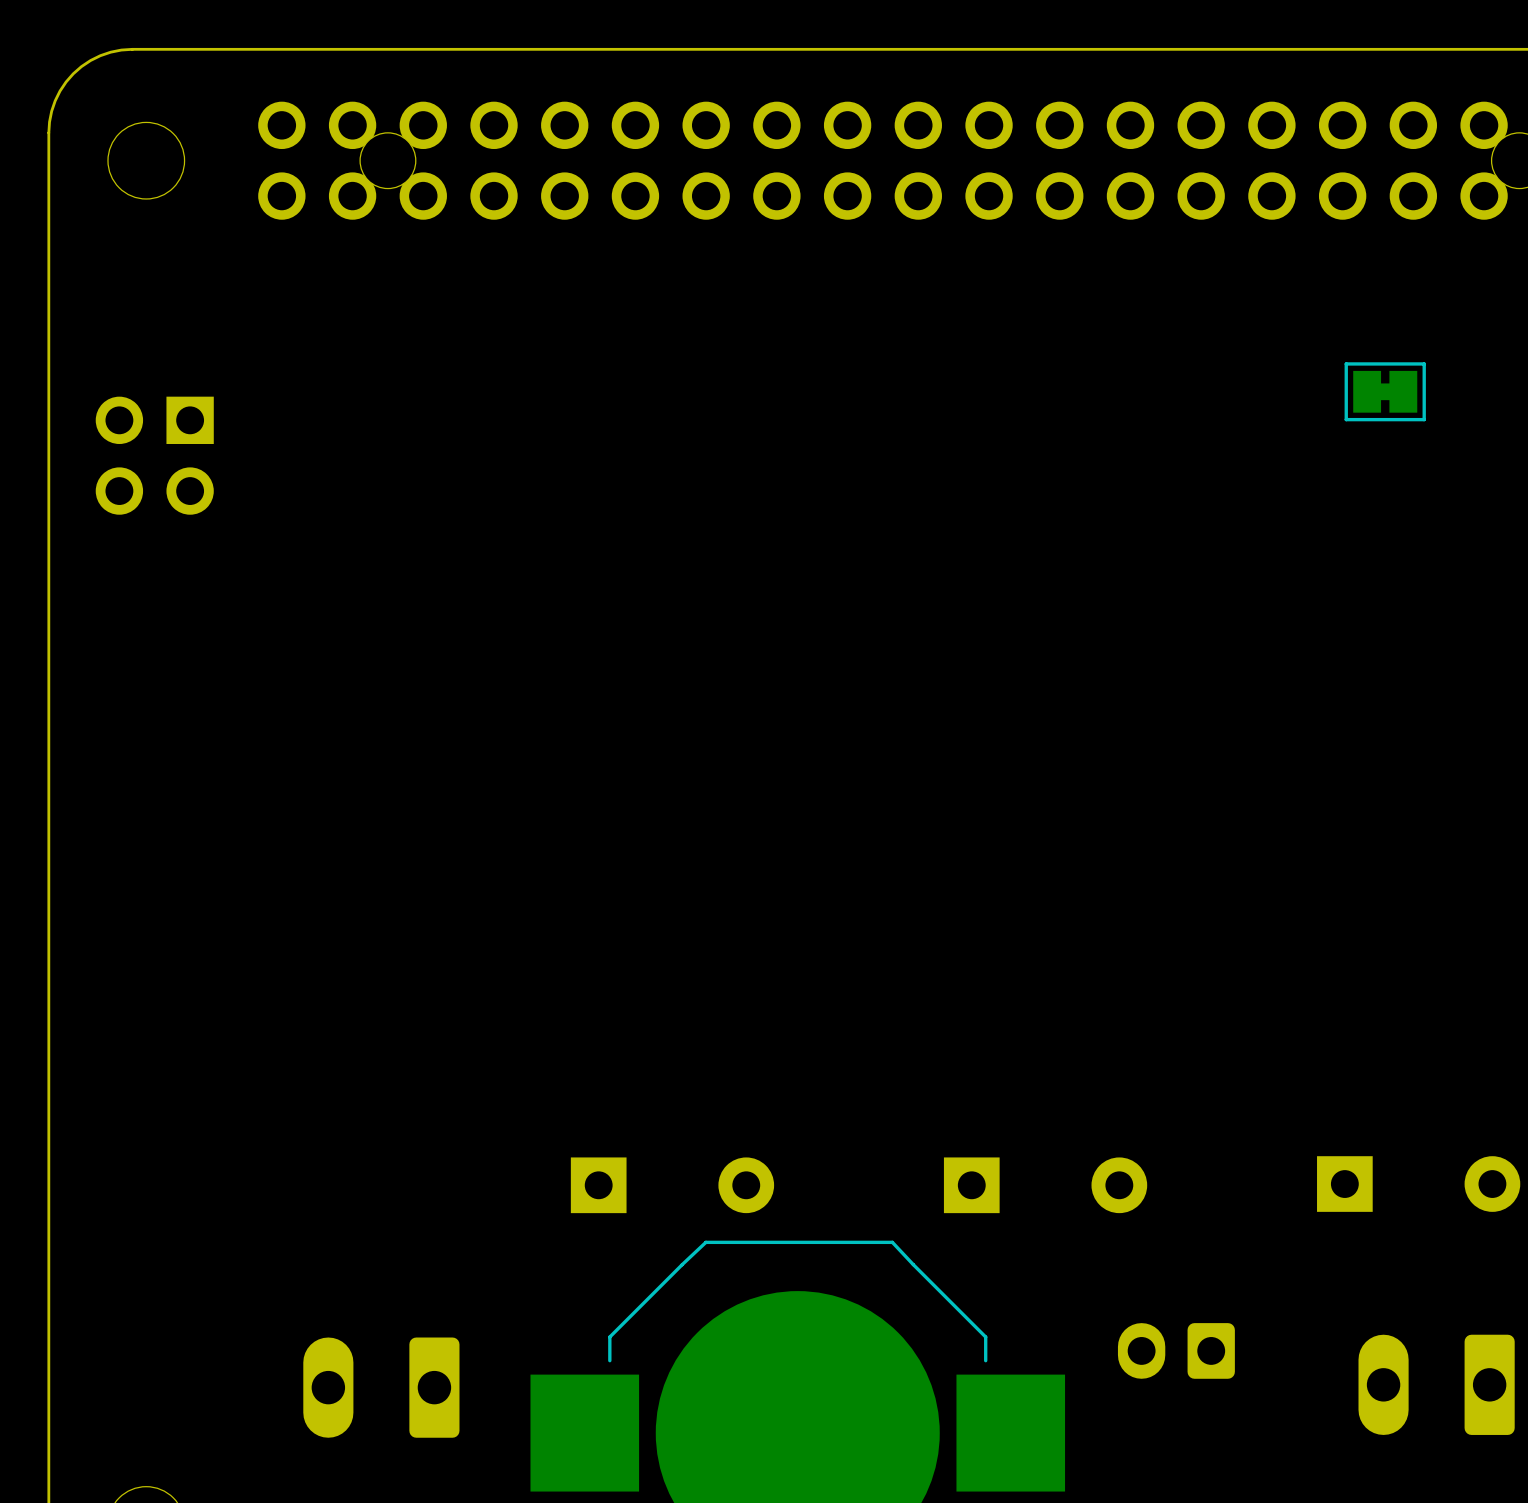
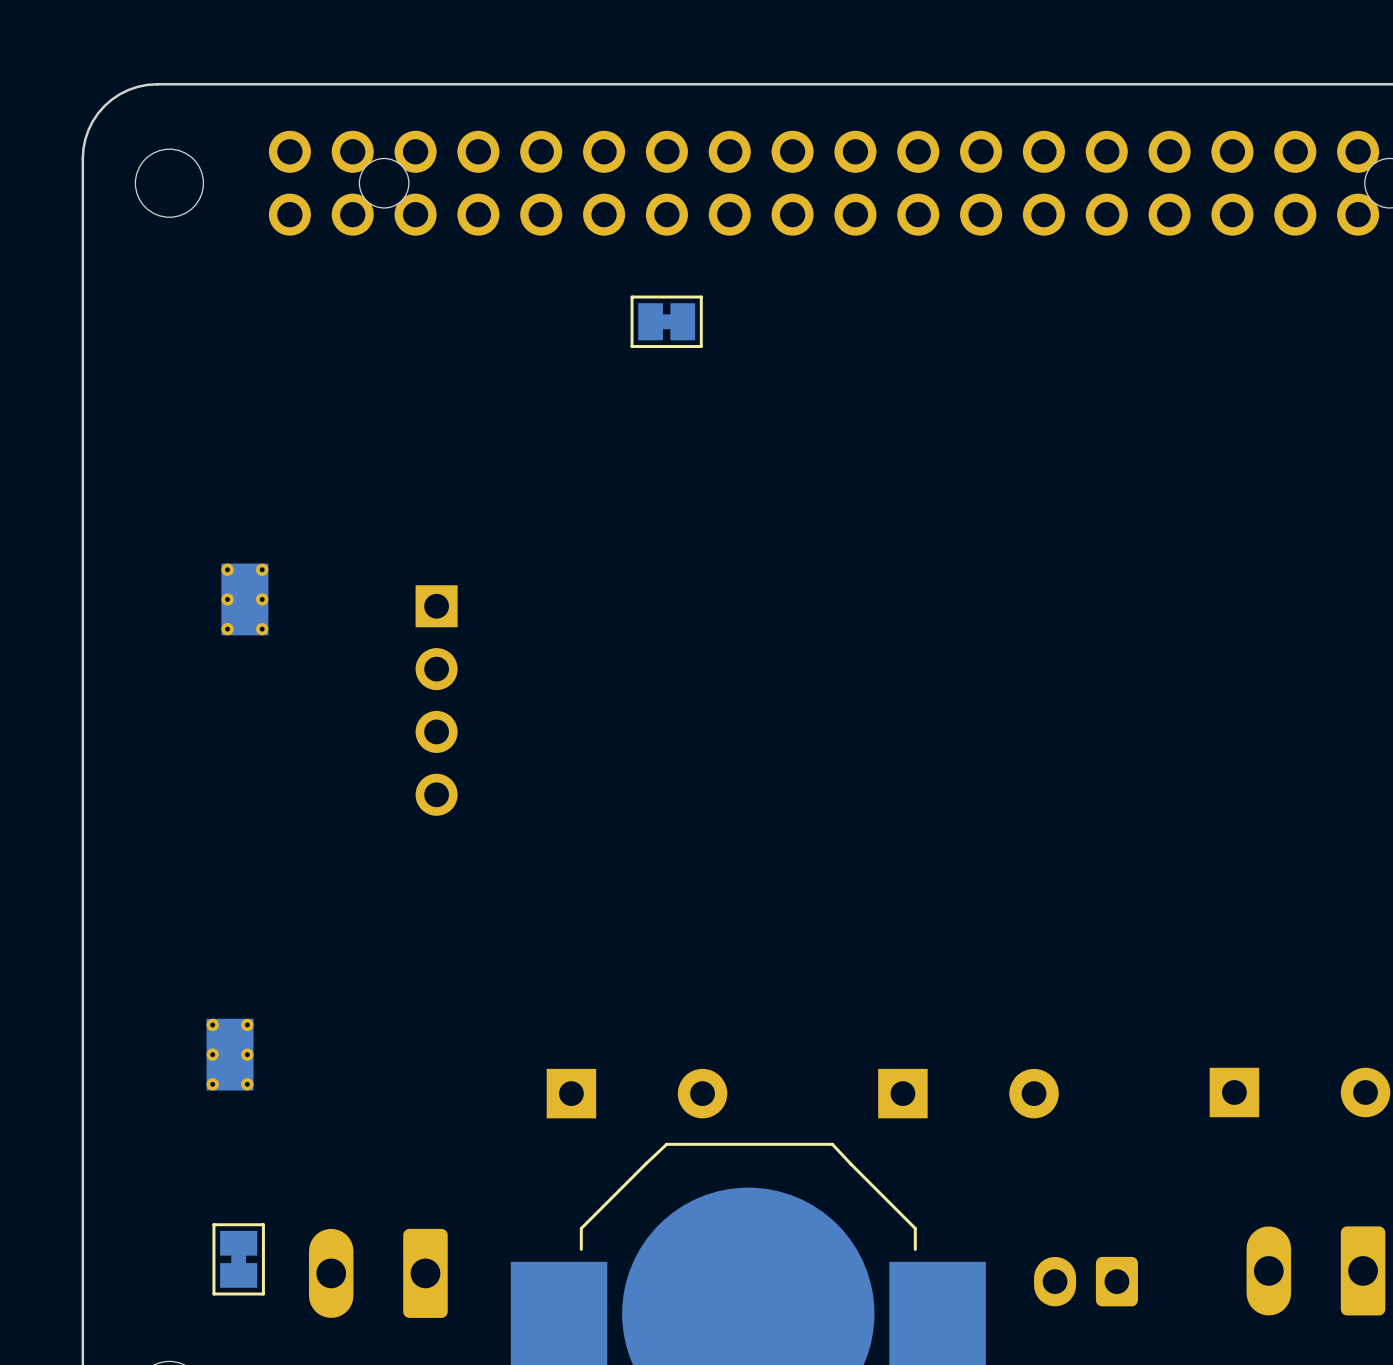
part position: (1385, 391) -> (666, 321)
part: (154, 455) -> none
part: none -> (244, 599)
part: none -> (436, 700)
part: none -> (230, 1054)
part position: (1176, 1350) -> (1085, 1281)
part: none -> (238, 1259)

